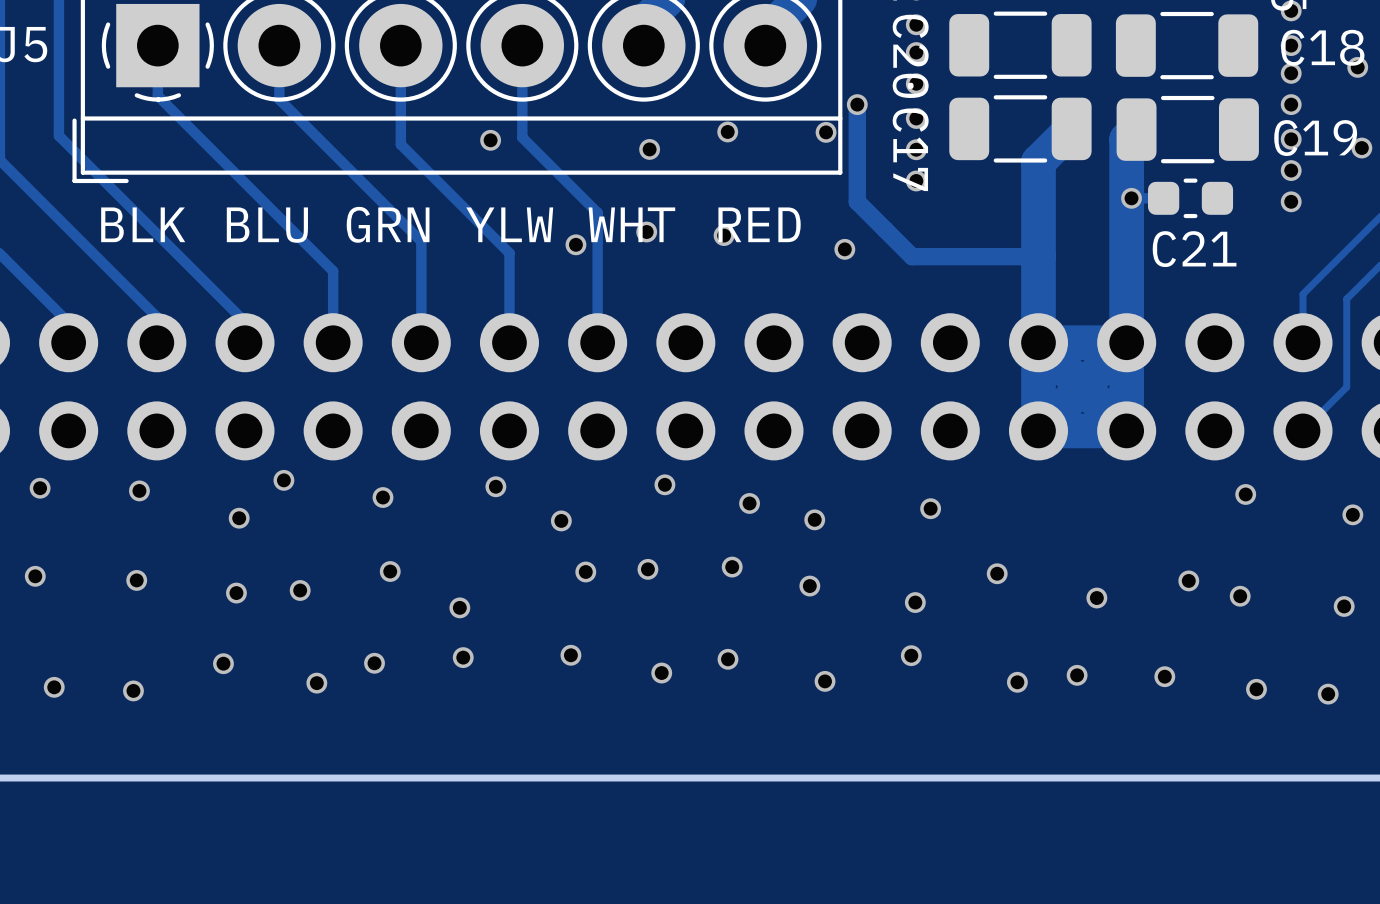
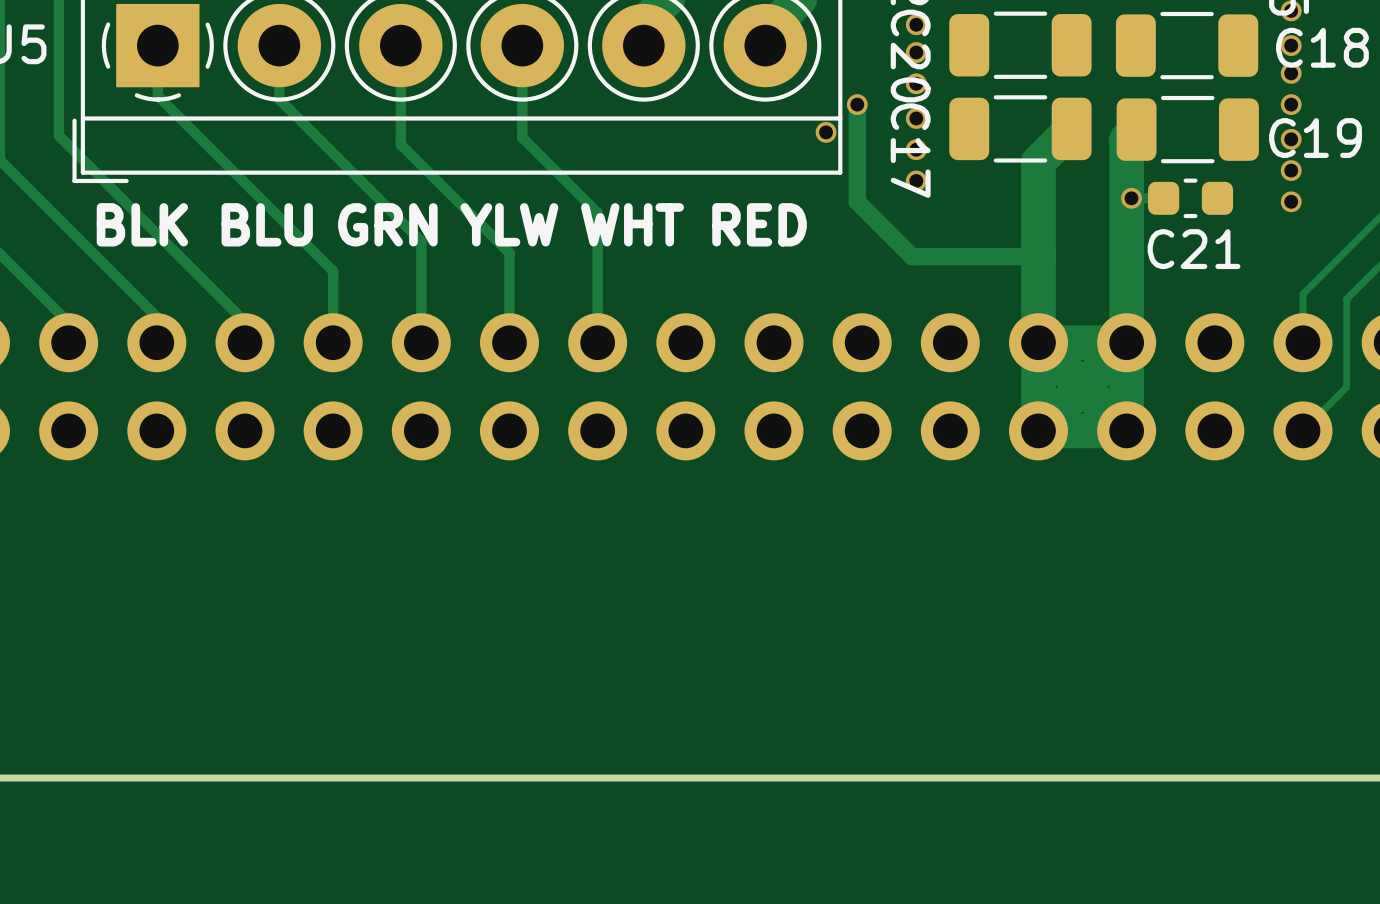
via: (1357, 67) -> none
via: (727, 131) -> none
via: (490, 140) -> none
via: (1361, 148) -> none
via: (649, 149) -> none
via: (646, 232) -> none
via: (724, 235) -> none
via: (575, 244) -> none
via: (844, 249) -> none
via: (283, 480) -> none
via: (664, 484) -> none
via: (495, 486) -> none
via: (40, 488) -> none
via: (139, 490) -> none
via: (1245, 494) -> none
via: (382, 497) -> none
via: (749, 503) -> none
via: (930, 508) -> none
via: (1352, 514) -> none
via: (239, 518) -> none
via: (814, 519) -> none
via: (561, 520) -> none
via: (732, 567) -> none
via: (647, 569) -> none
via: (390, 571) -> none
via: (585, 571) -> none
via: (997, 573) -> none
via: (35, 576) -> none
via: (136, 580) -> none
via: (1188, 580) -> none
via: (809, 586) -> none
via: (300, 590) -> none
via: (236, 593) -> none
via: (1240, 596) -> none
via: (1096, 598) -> none
via: (915, 602) -> none
via: (1344, 606) -> none
via: (459, 607) -> none
via: (570, 655) -> none
via: (911, 655) -> none
via: (463, 657) -> none
via: (728, 659) -> none
via: (223, 663) -> none
via: (374, 663) -> none
via: (661, 673) -> none
via: (1077, 675) -> none
via: (1164, 676) -> none
via: (825, 681) -> none
via: (1017, 682) -> none
via: (316, 683) -> none
via: (54, 687) -> none
via: (1256, 689) -> none
via: (133, 690) -> none
via: (1328, 694) -> none

